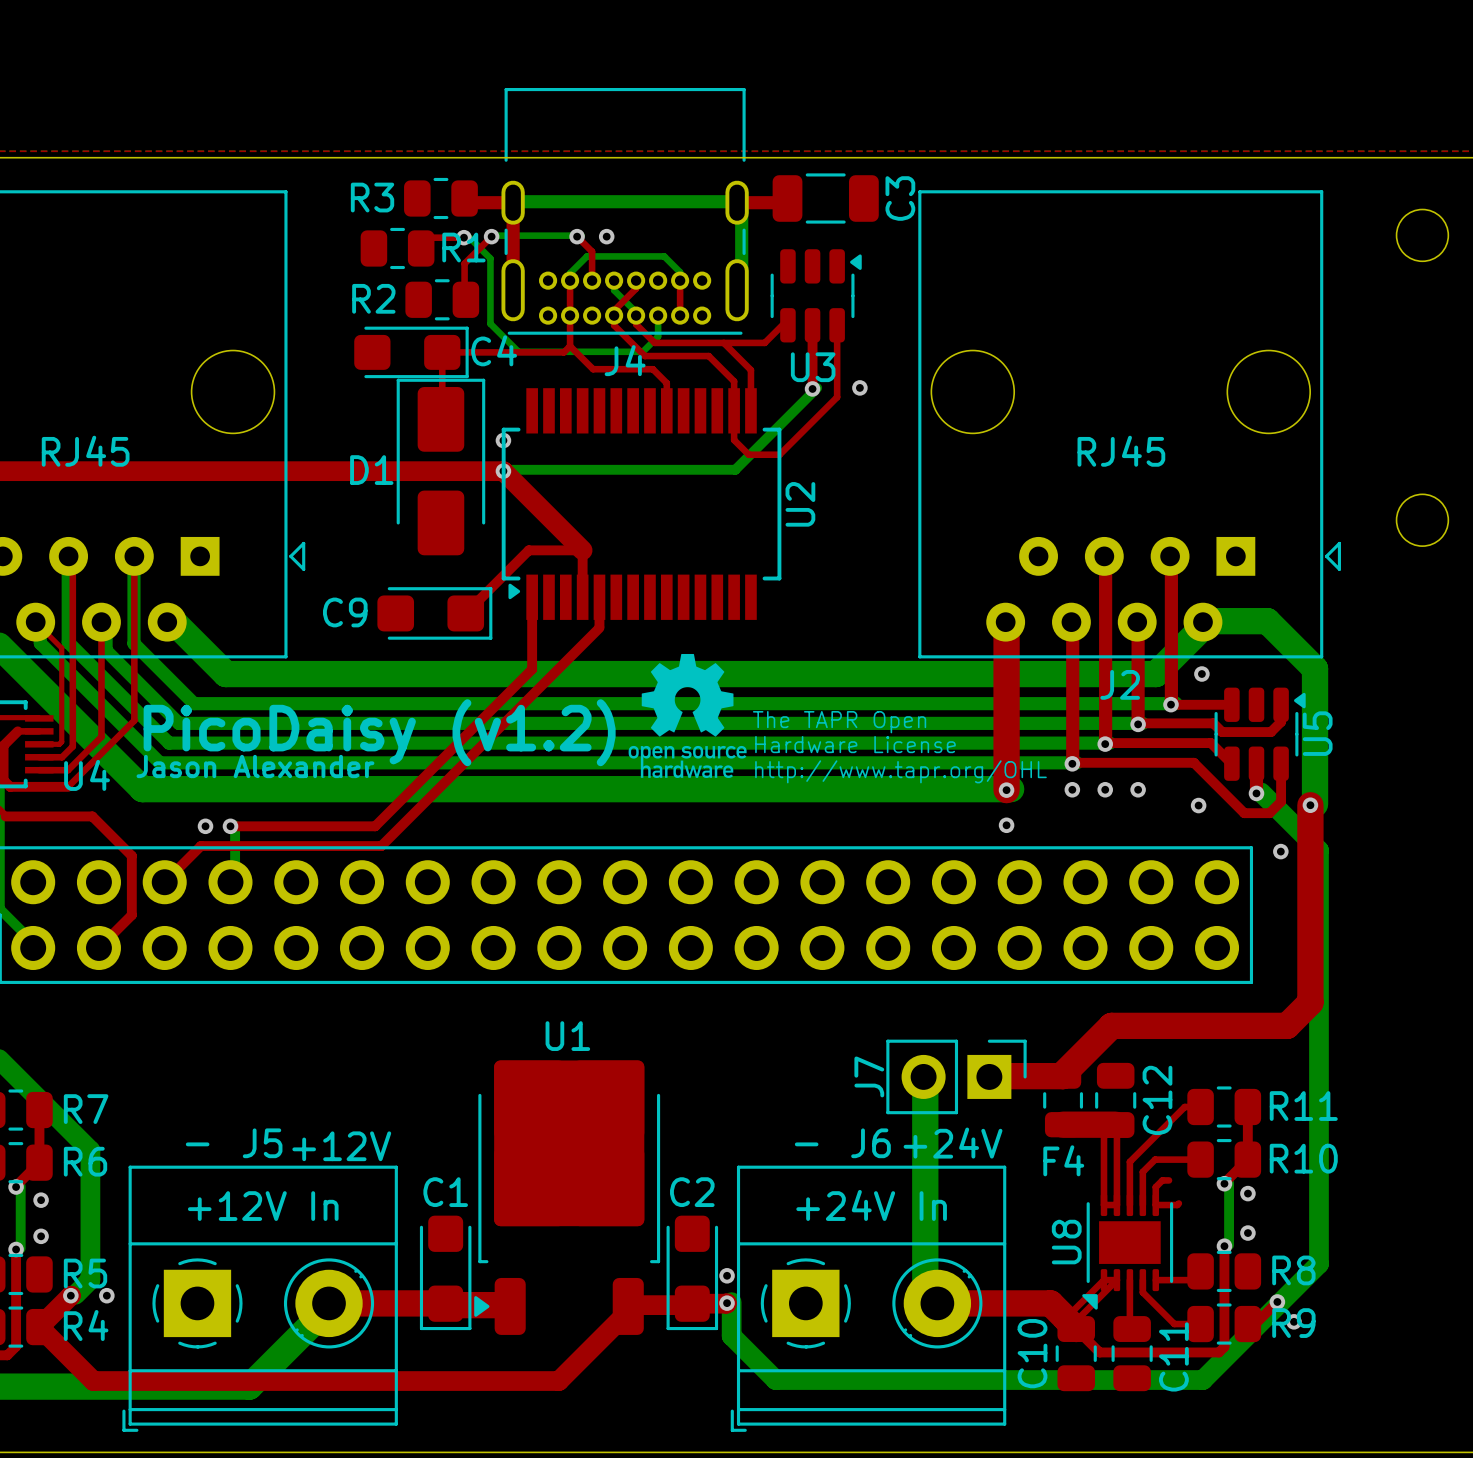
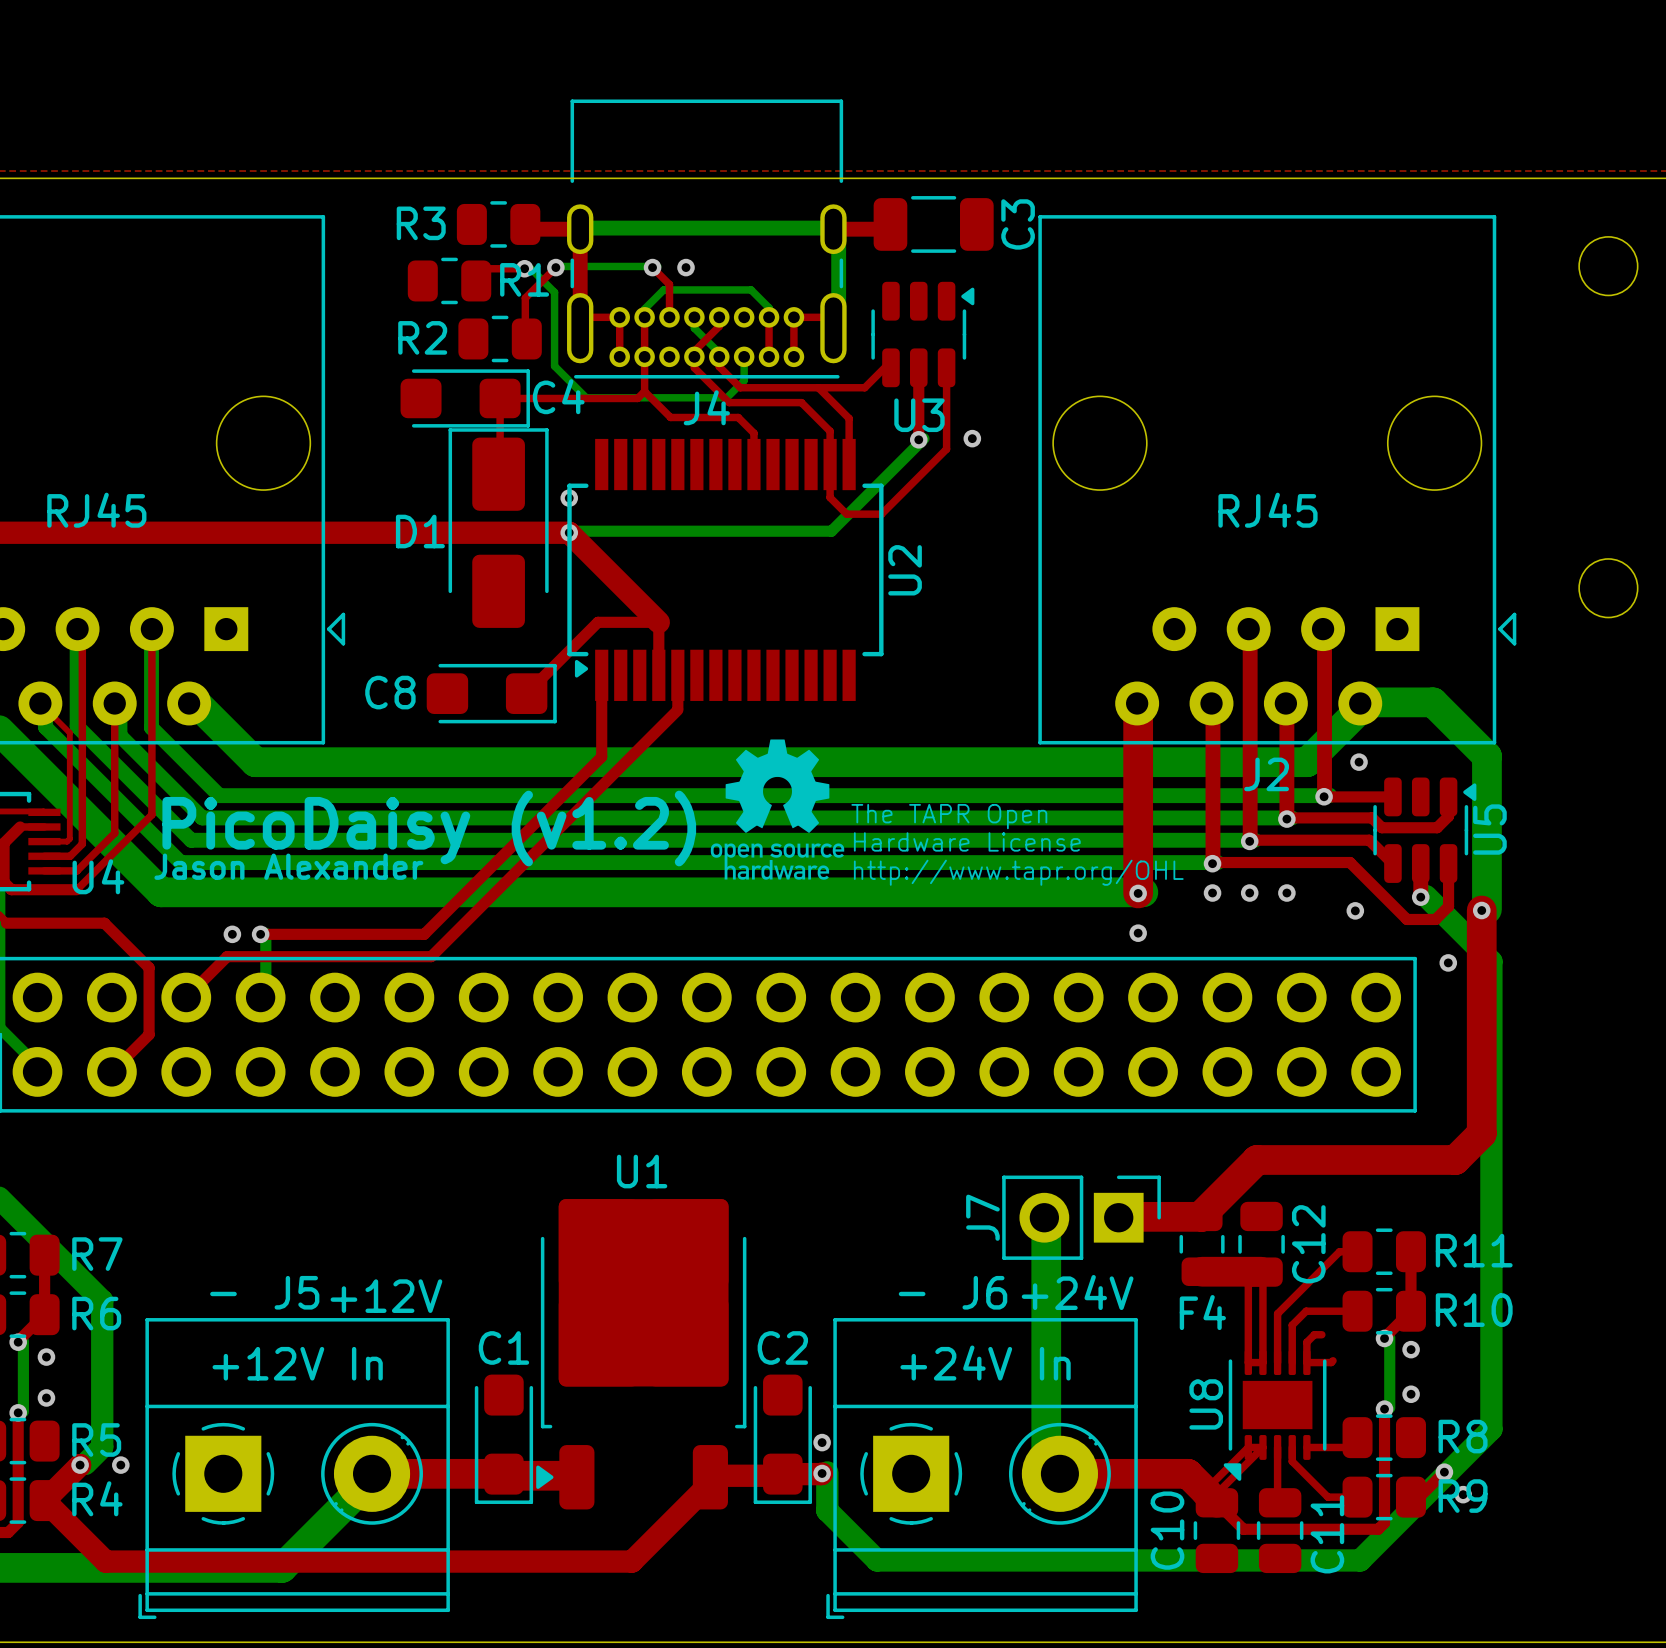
top track: none -> (580, 328) (591, 317) (619, 317) (619, 356)
top track: none -> (833, 328) (822, 317) (793, 317) (793, 356)
C9 name: C9 (345, 612) -> C8 (390, 692)

